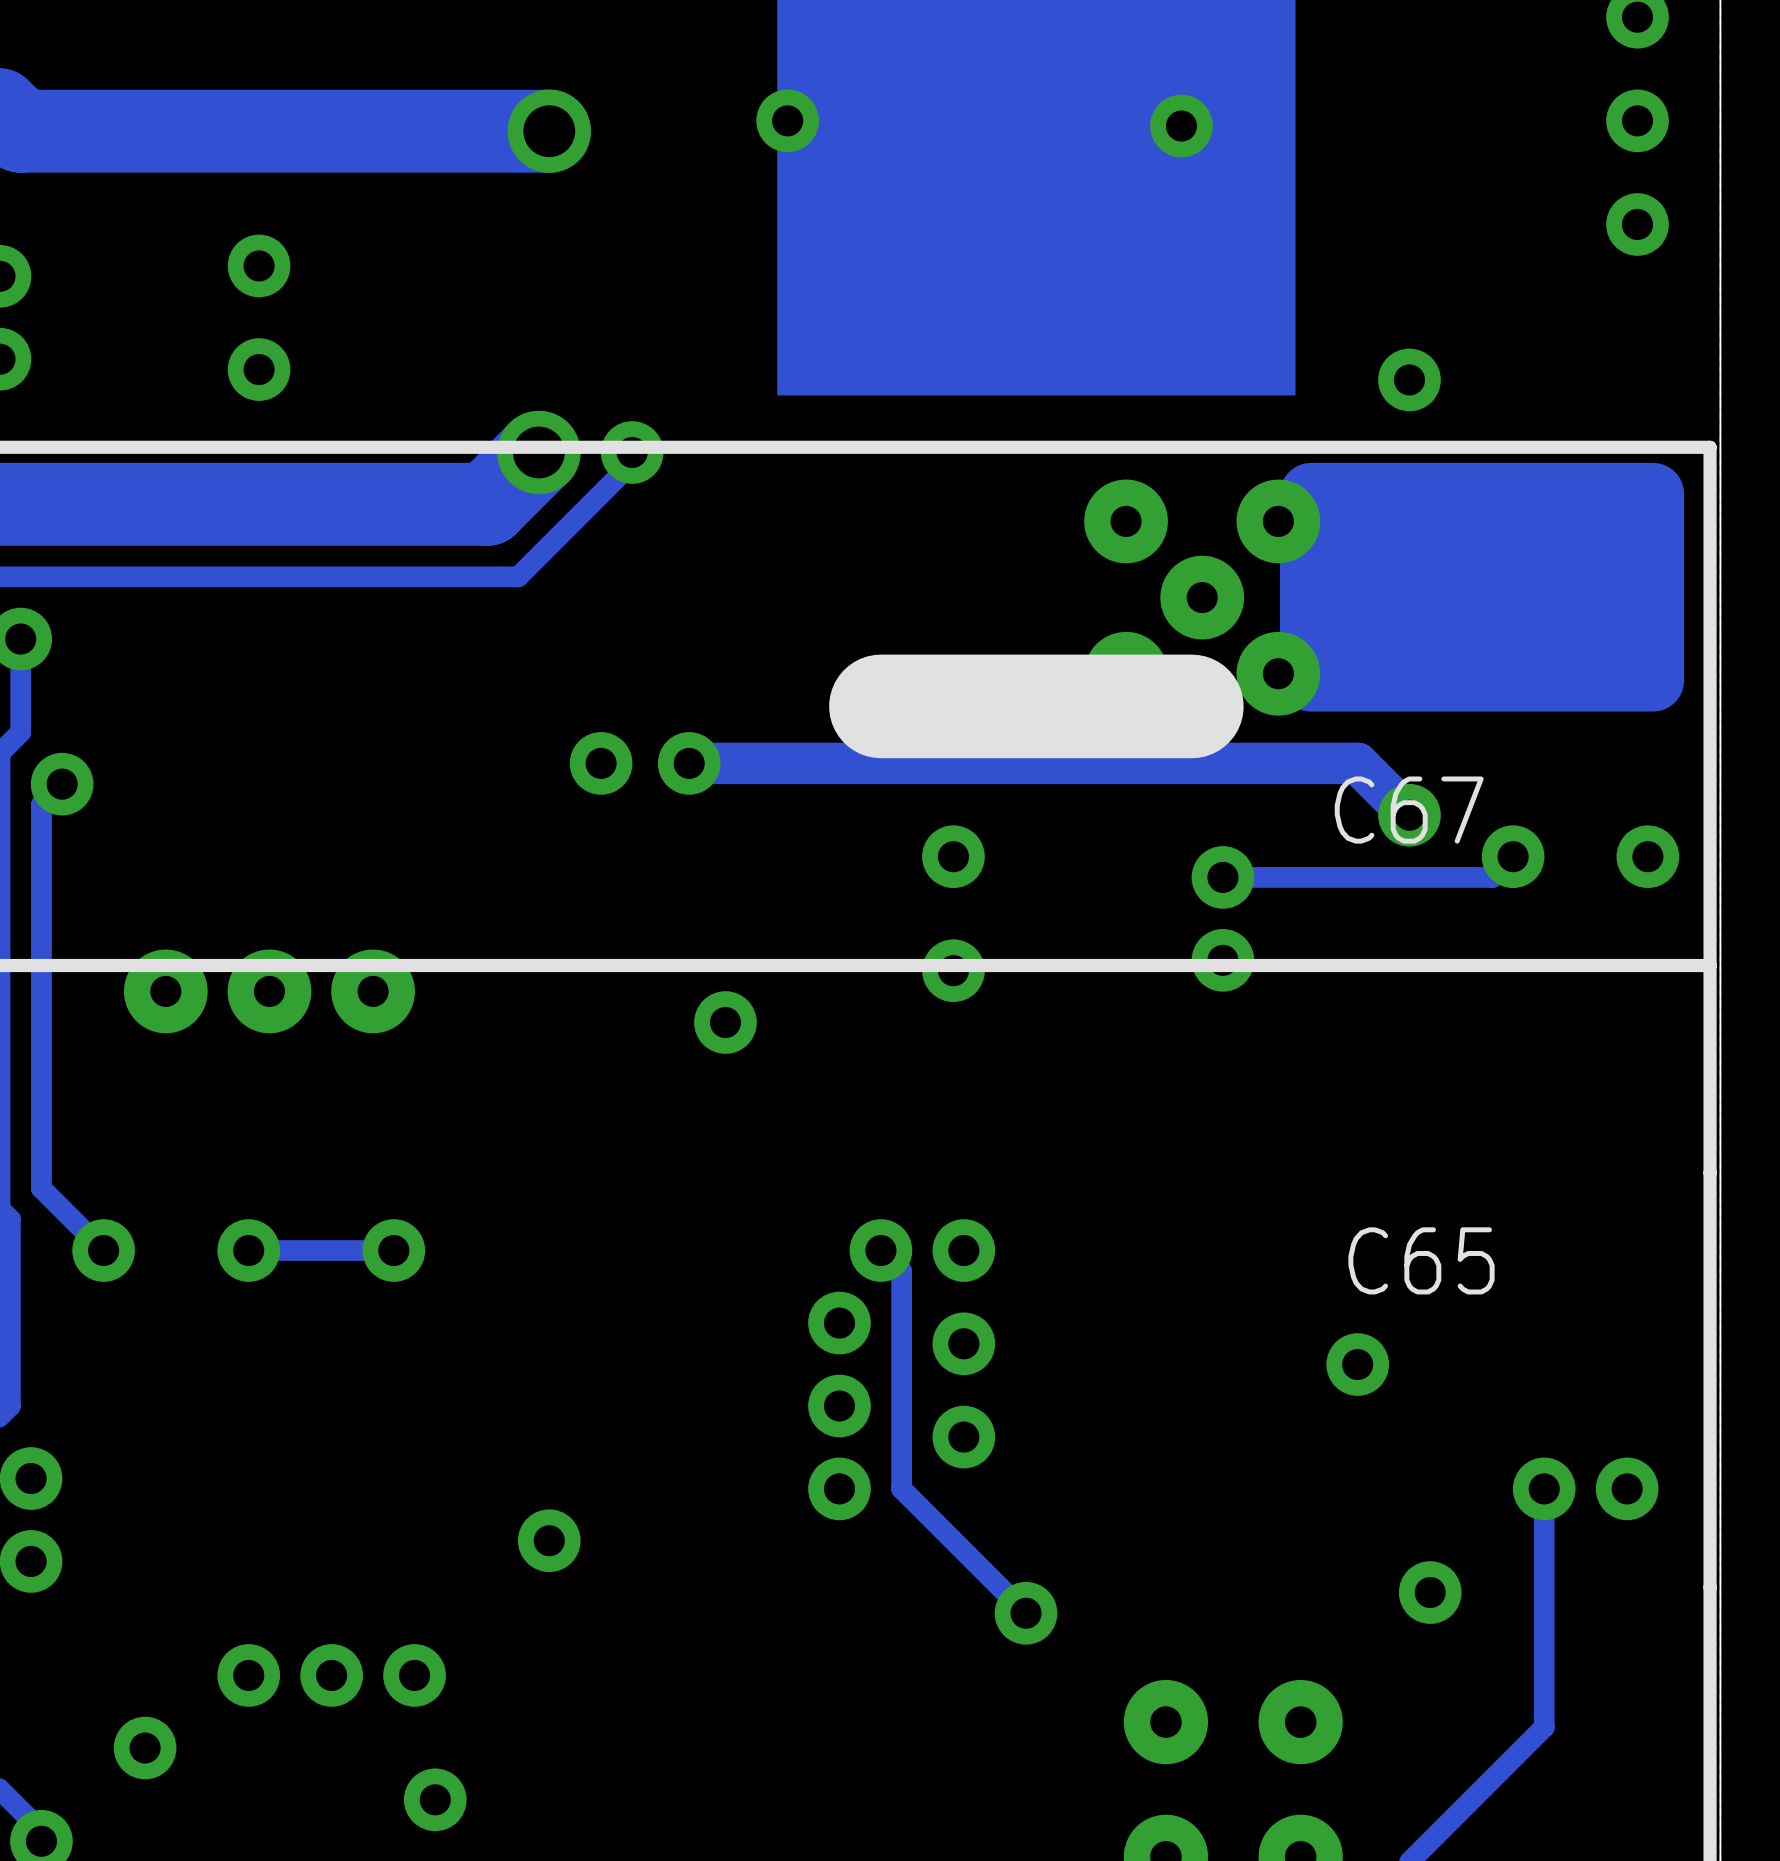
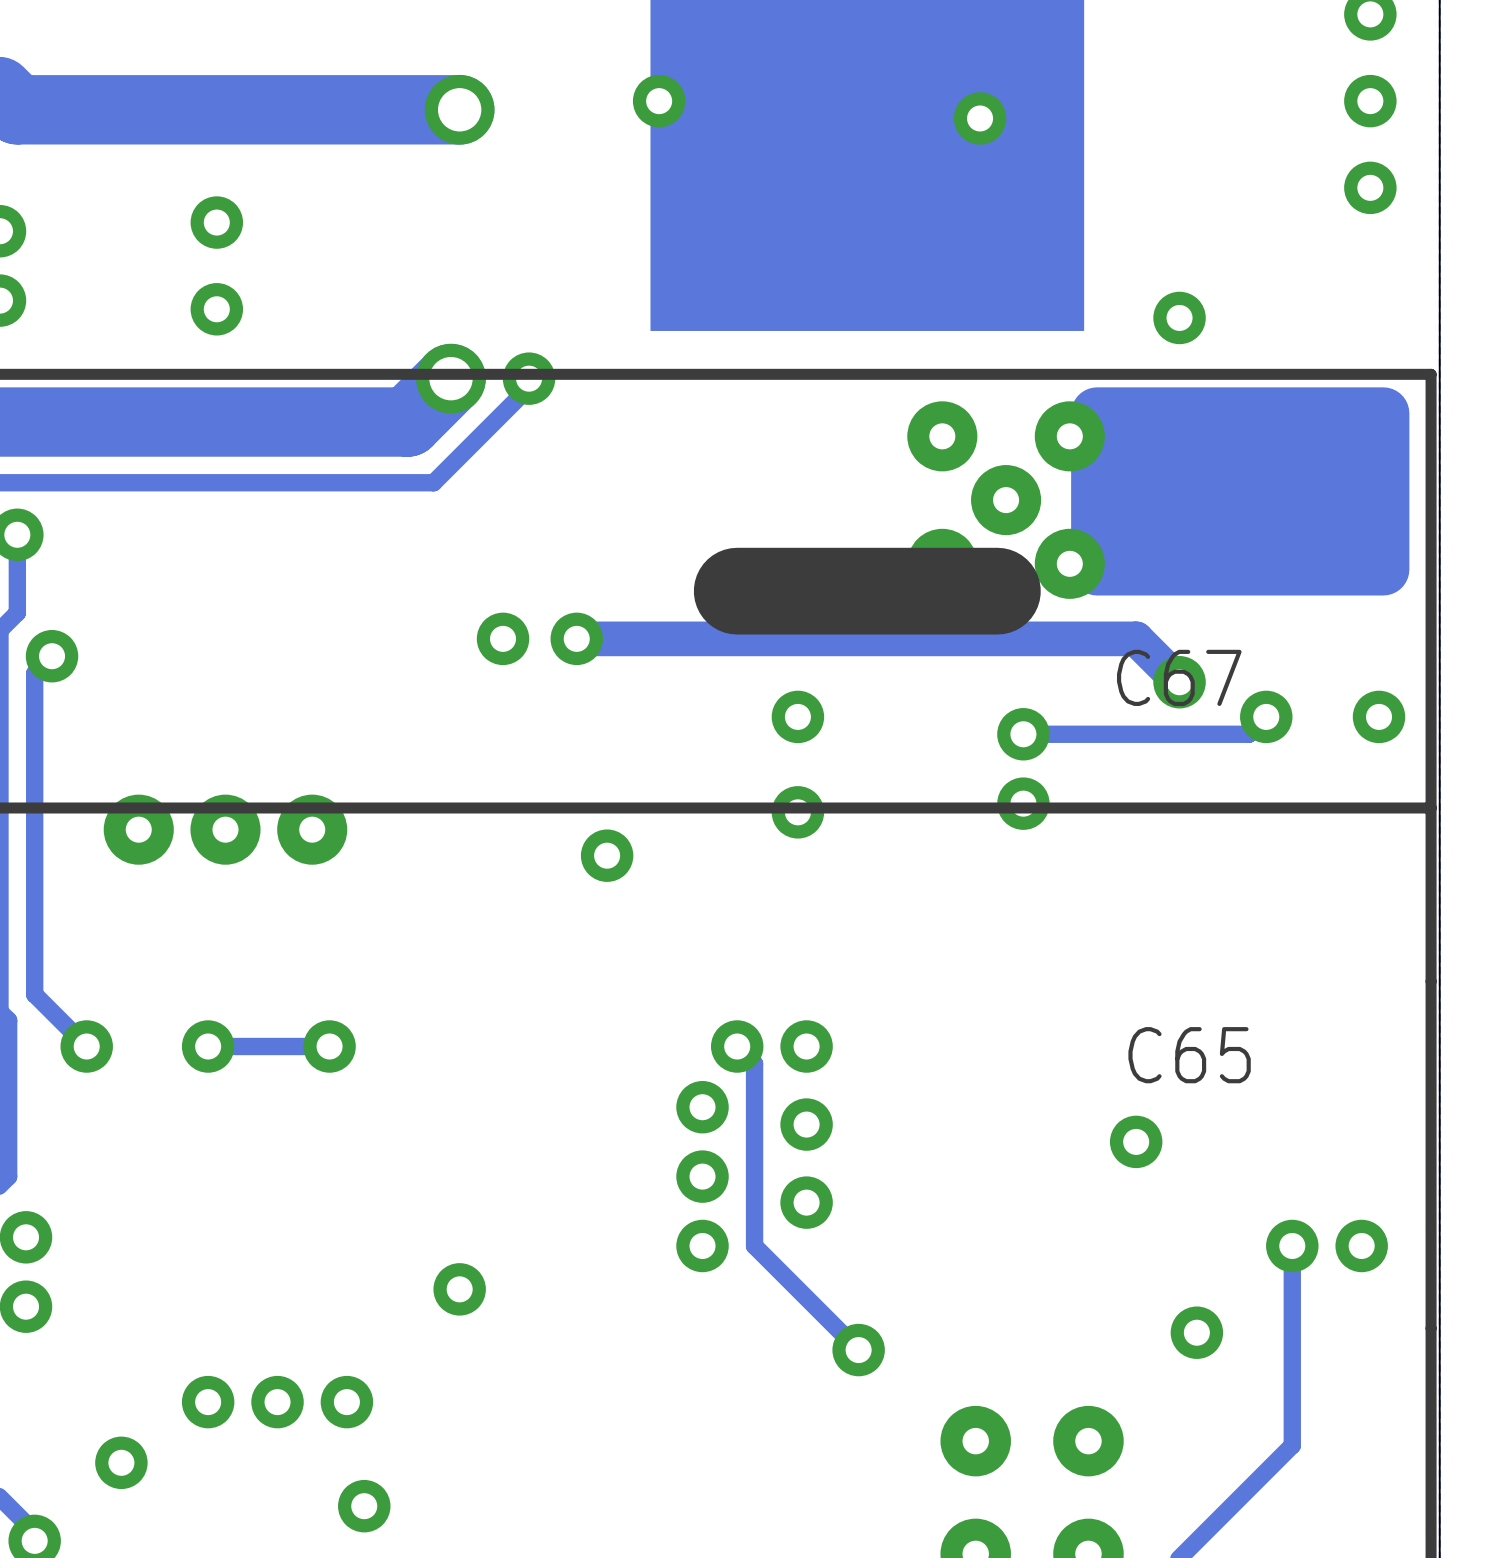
via position: (1181, 126) -> (980, 118)

